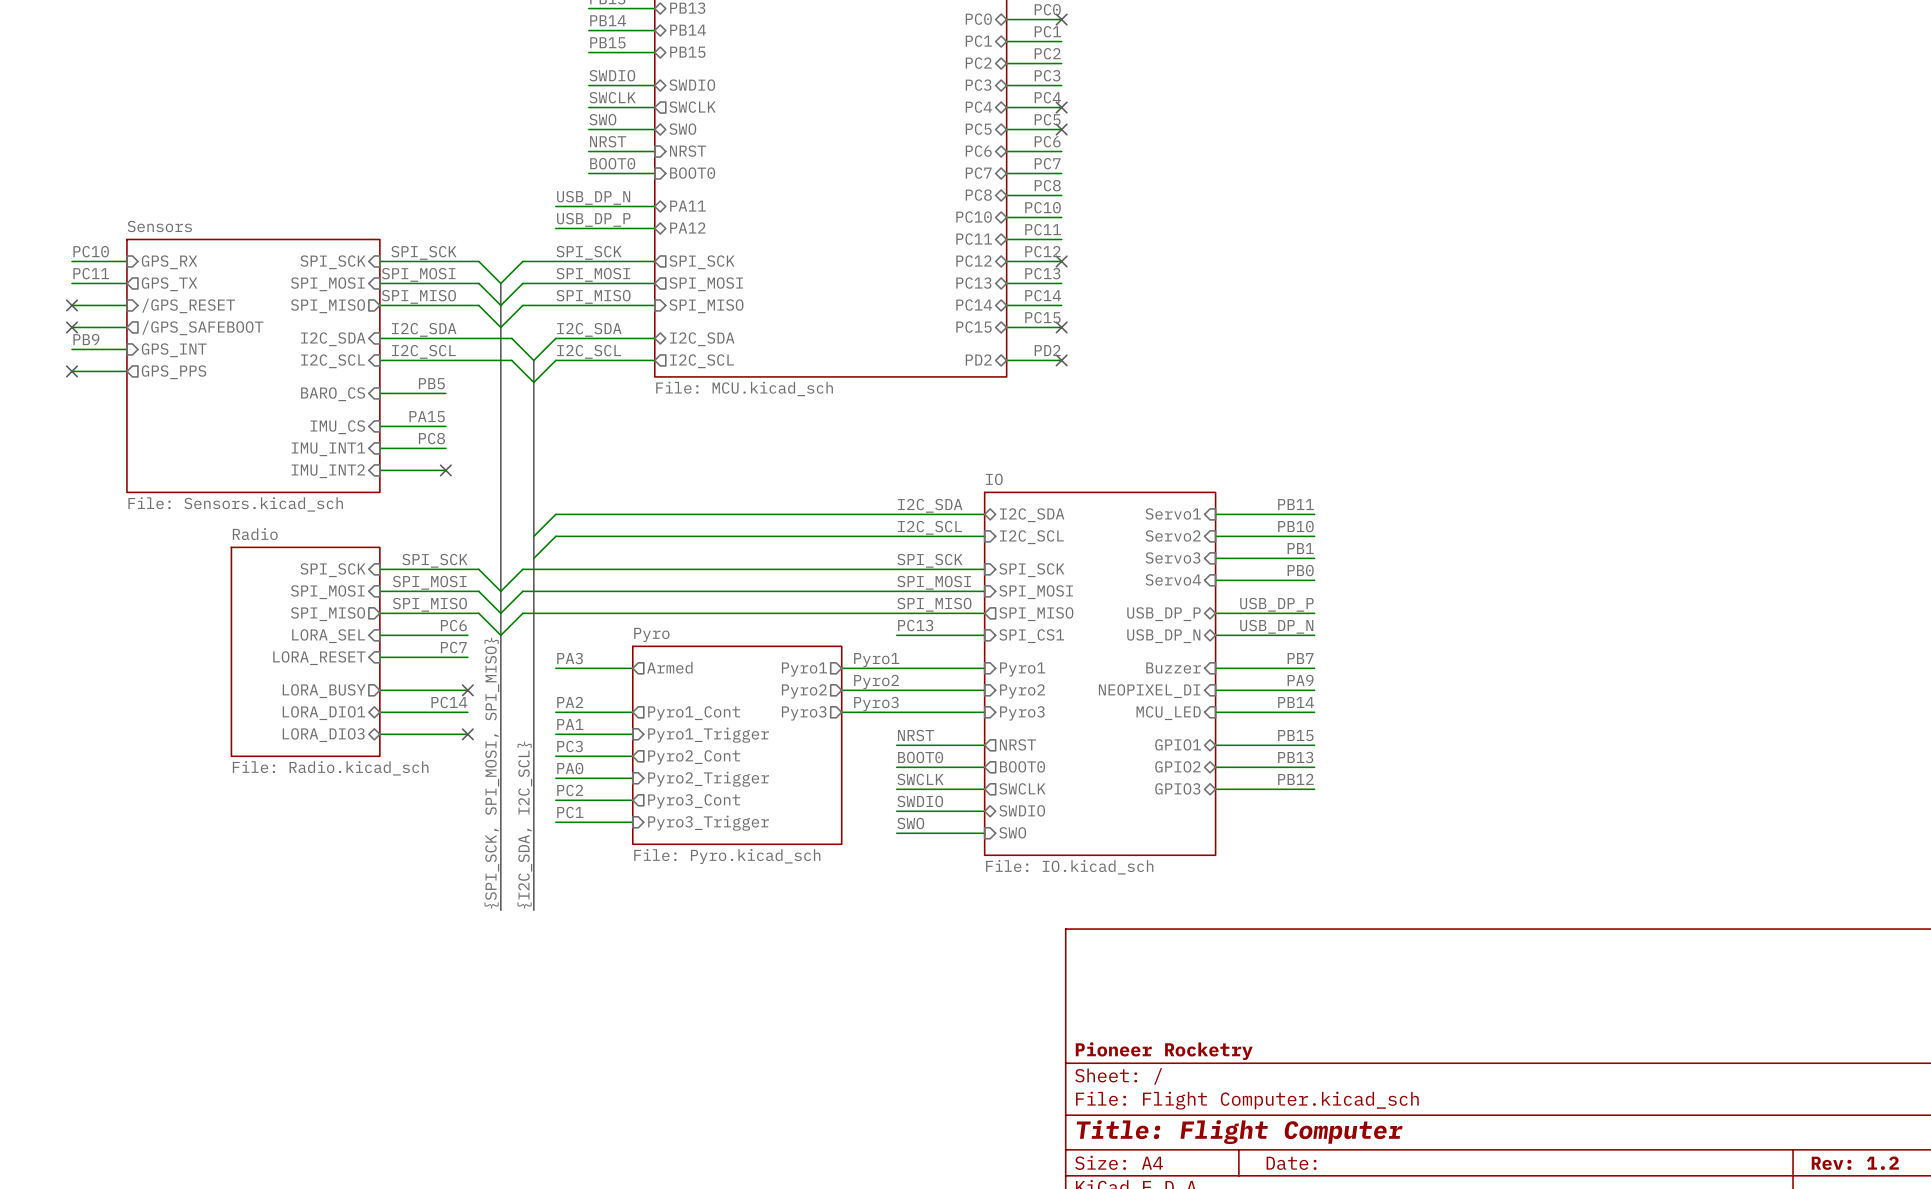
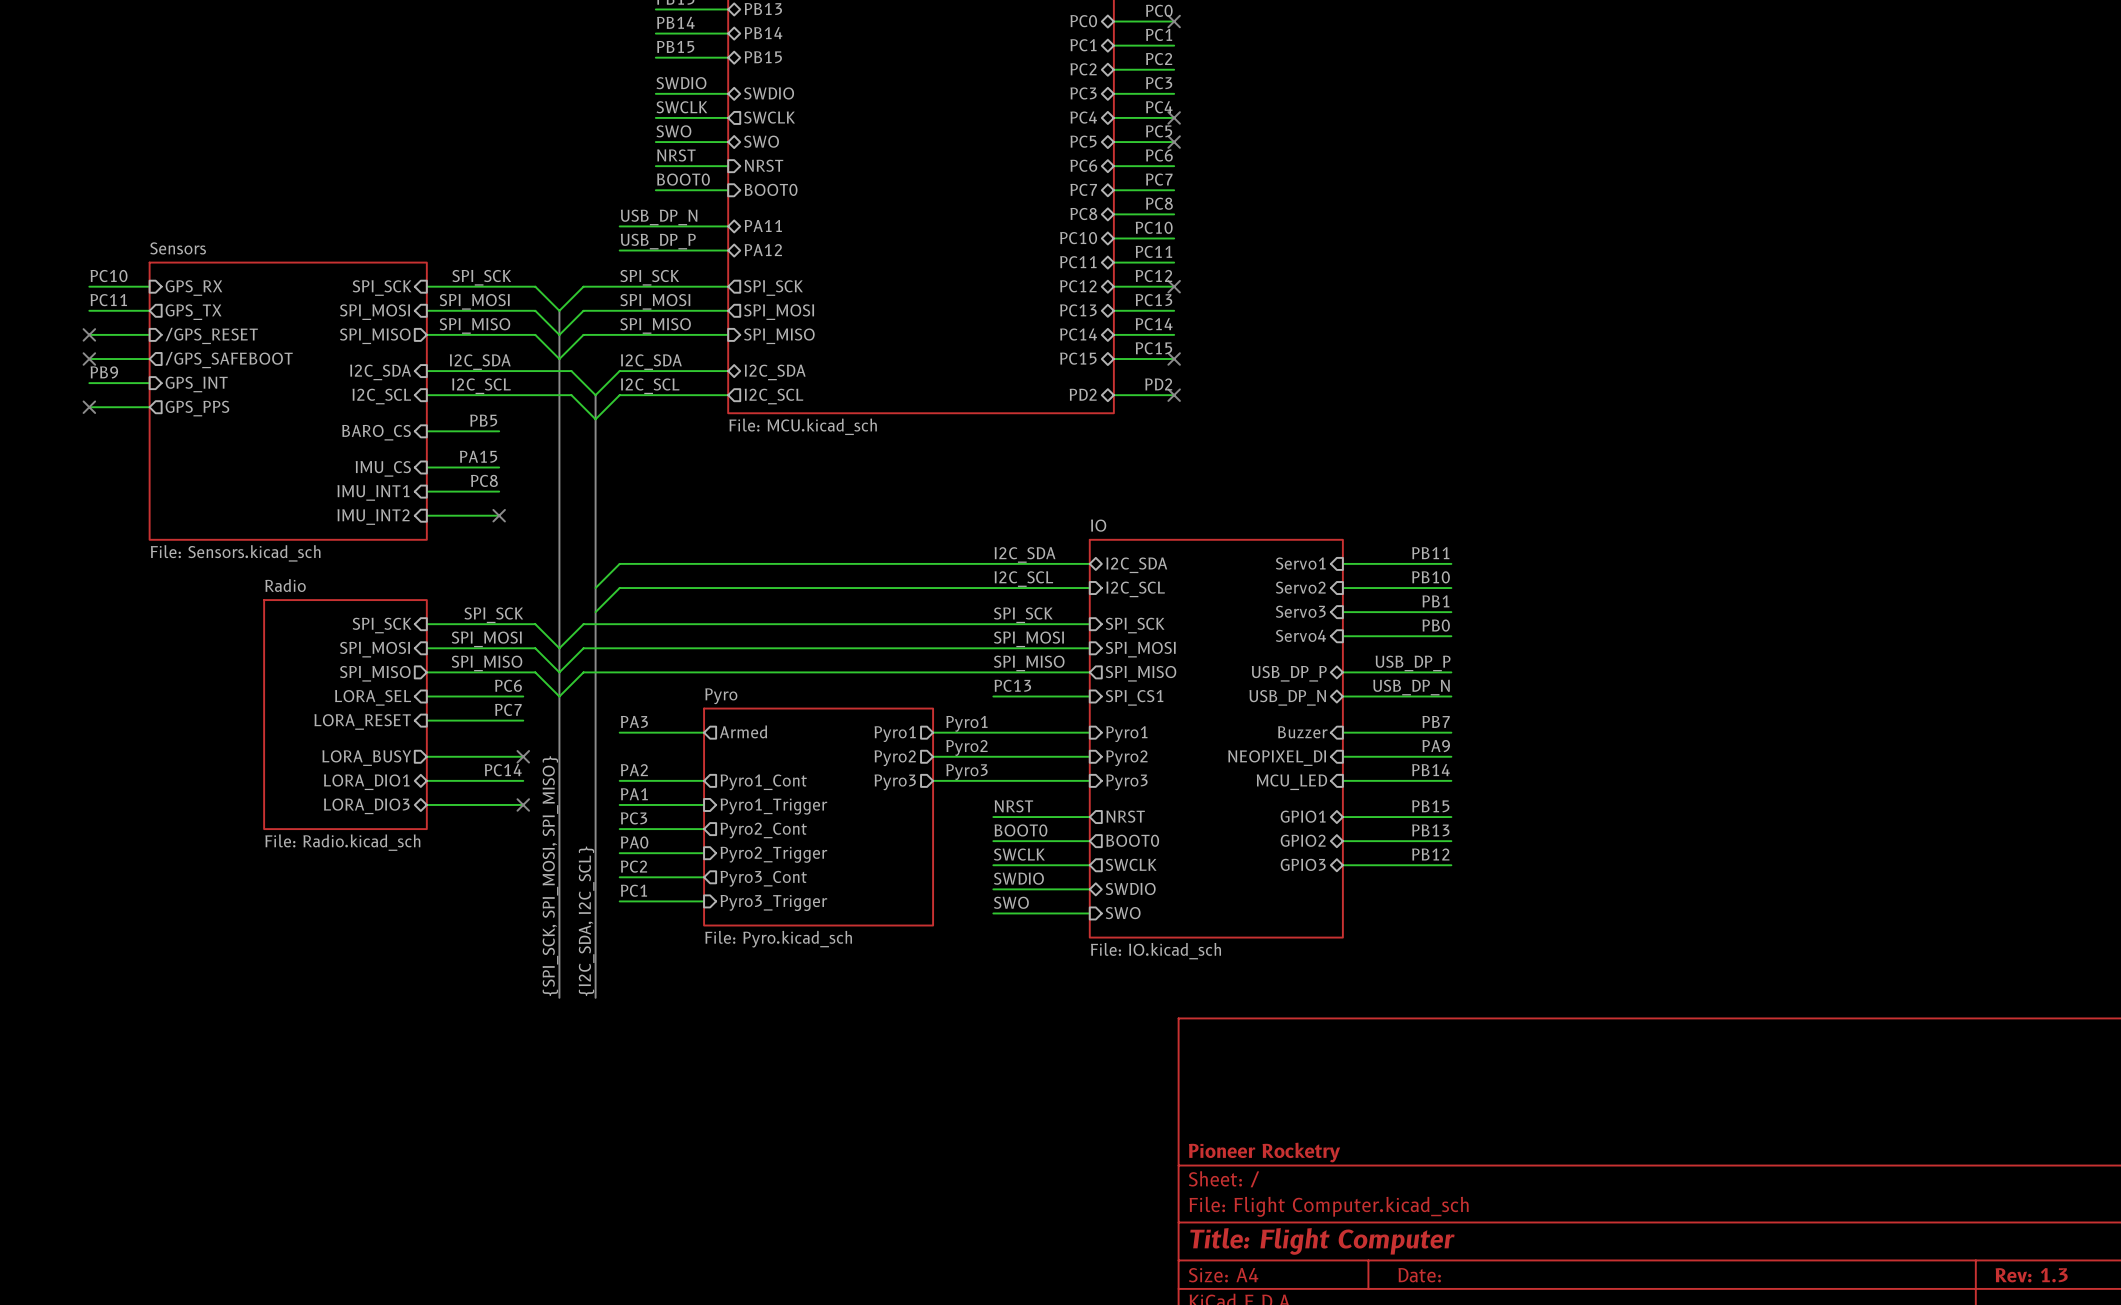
title block: Rev: 1.2 (1855, 1163) -> Rev: 1.3 (2031, 1275)

